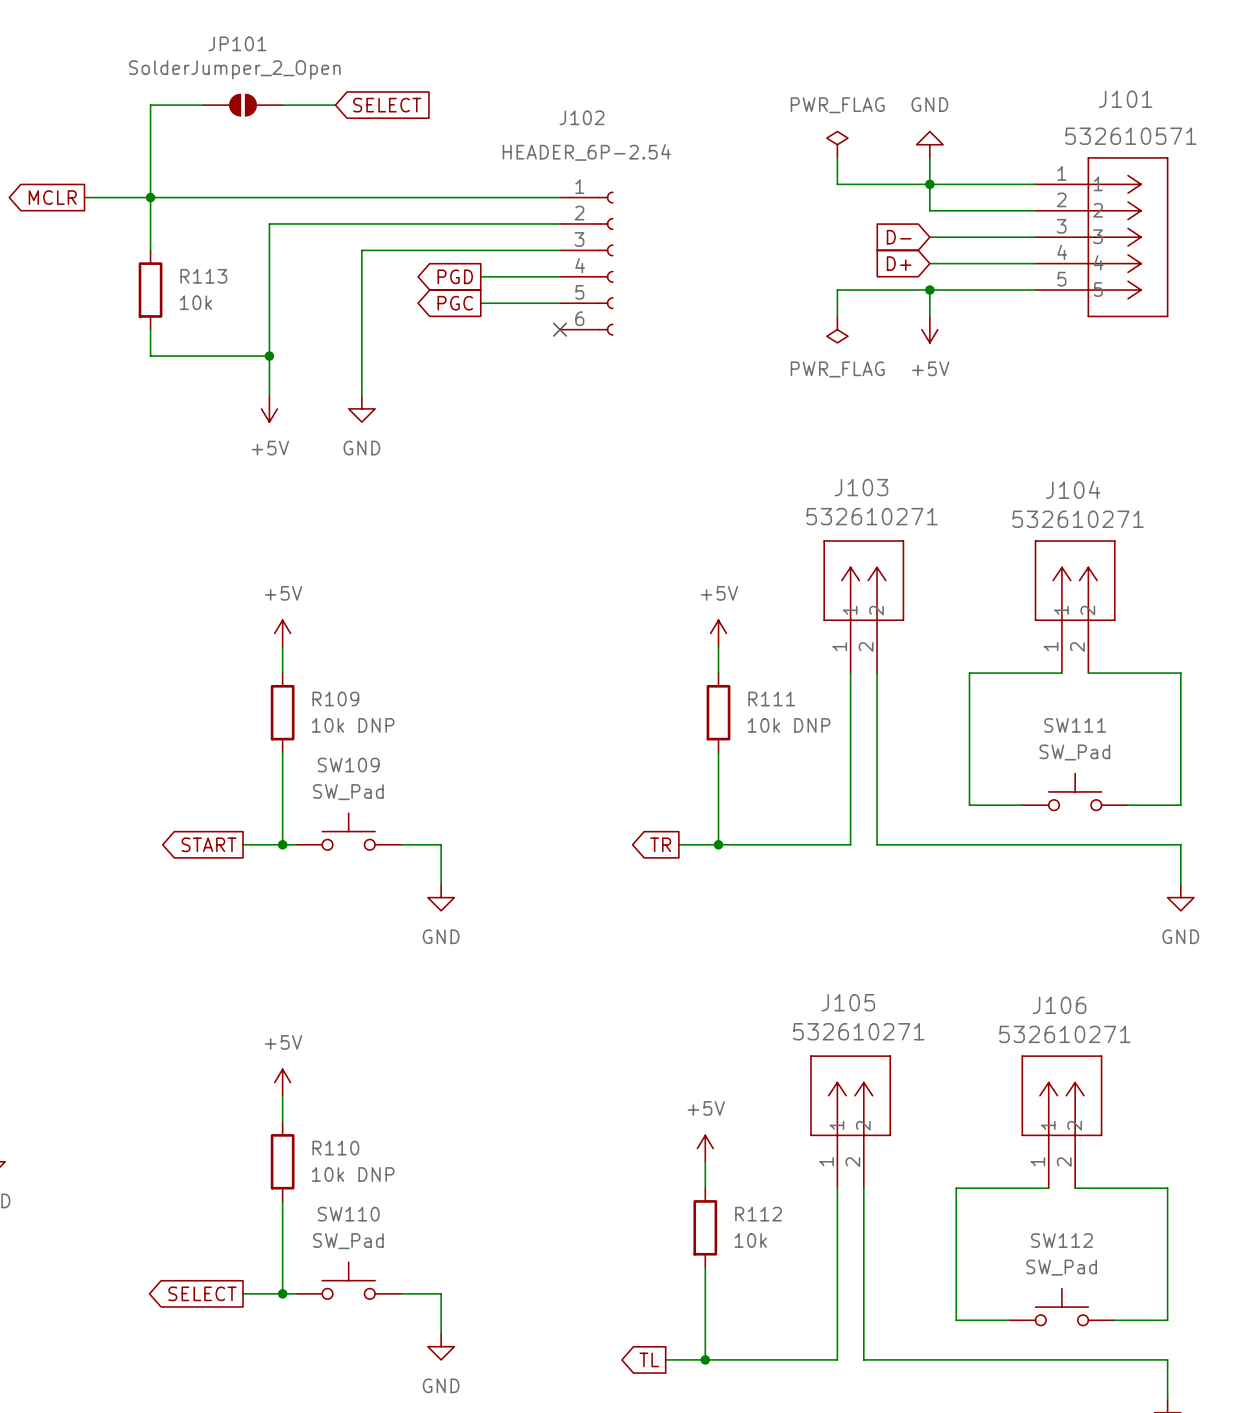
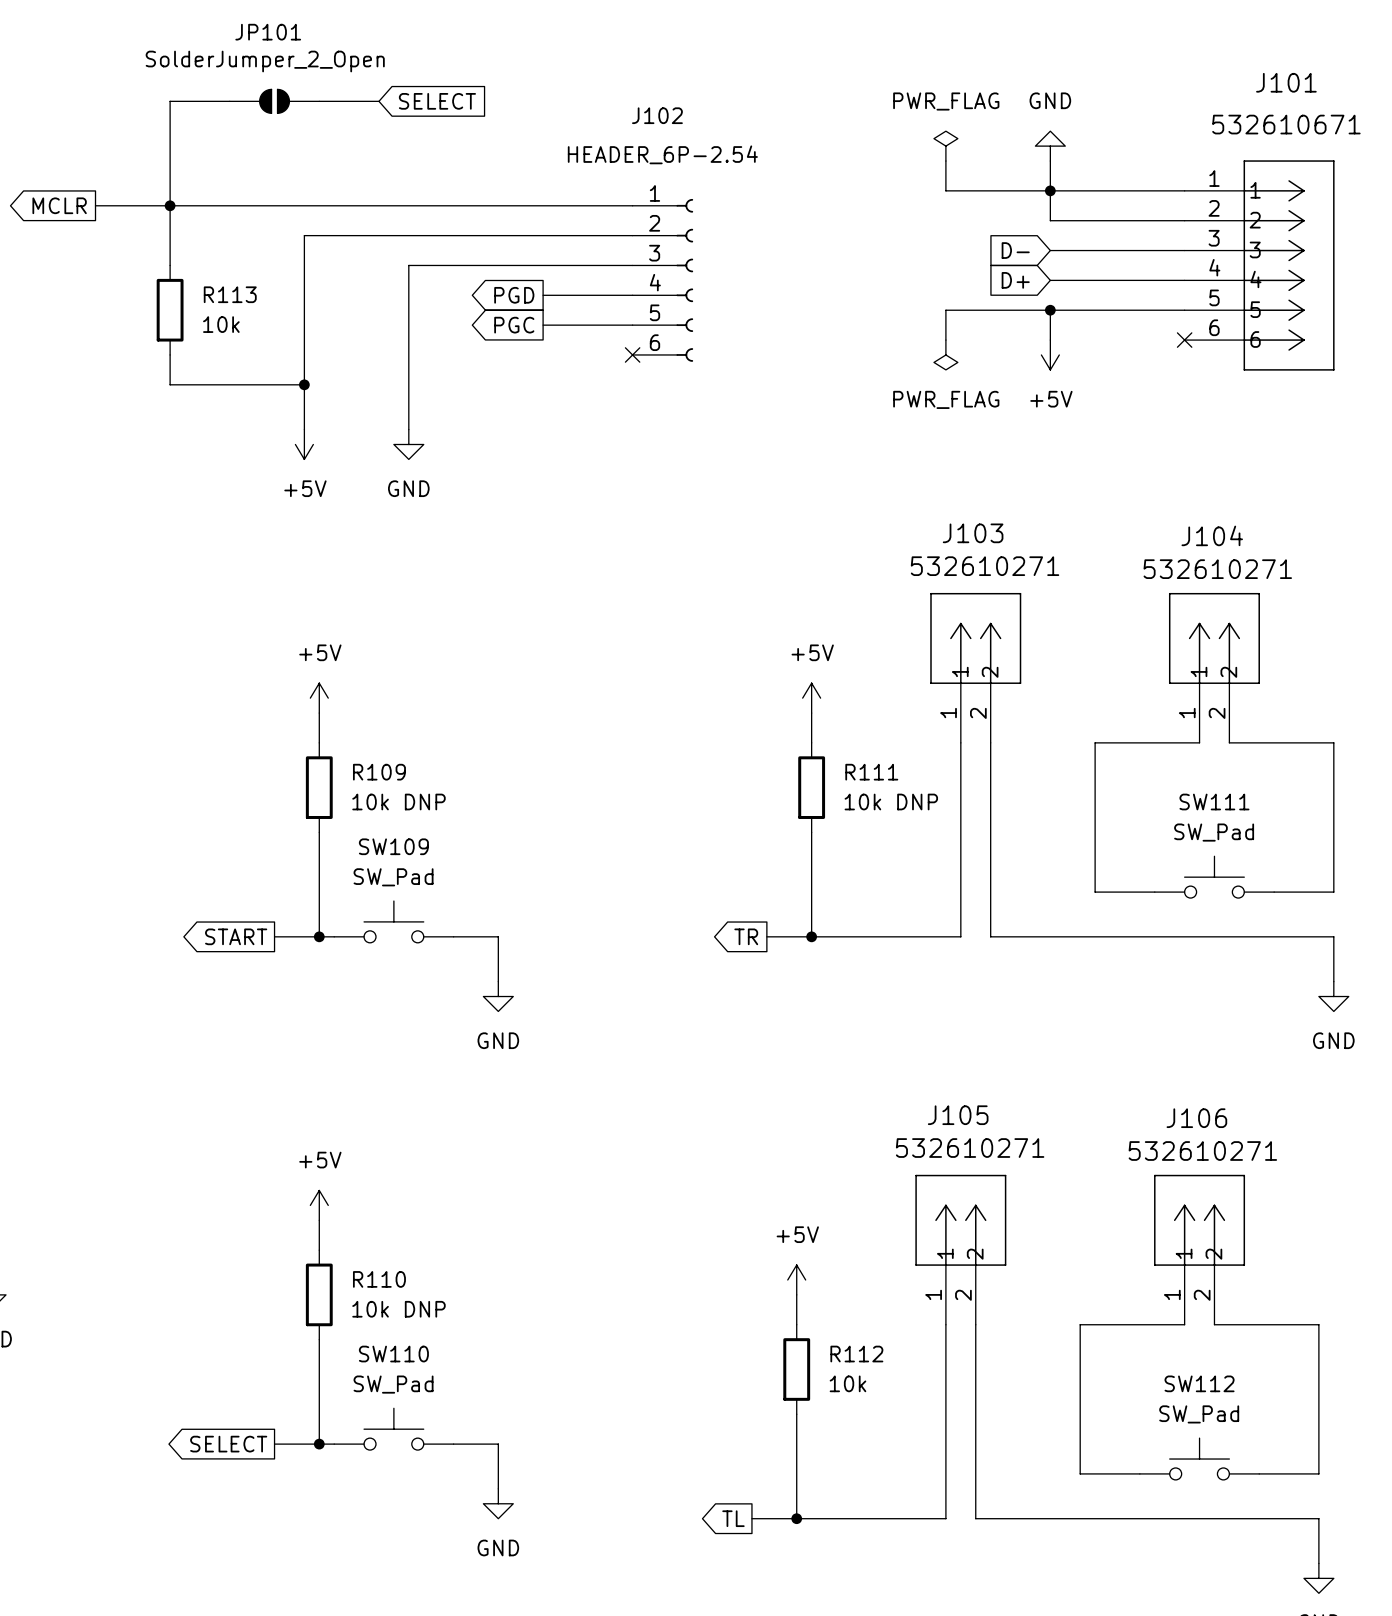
J101 name position: J101 (1125, 99) -> J101 (1286, 82)
J101 value: 532610571 (1130, 136) -> 532610671 (1286, 124)
J101 symbol: [1035, 157, 1169, 318] -> [1184, 160, 1335, 371]
no-connect mark: none -> (1184, 340)

